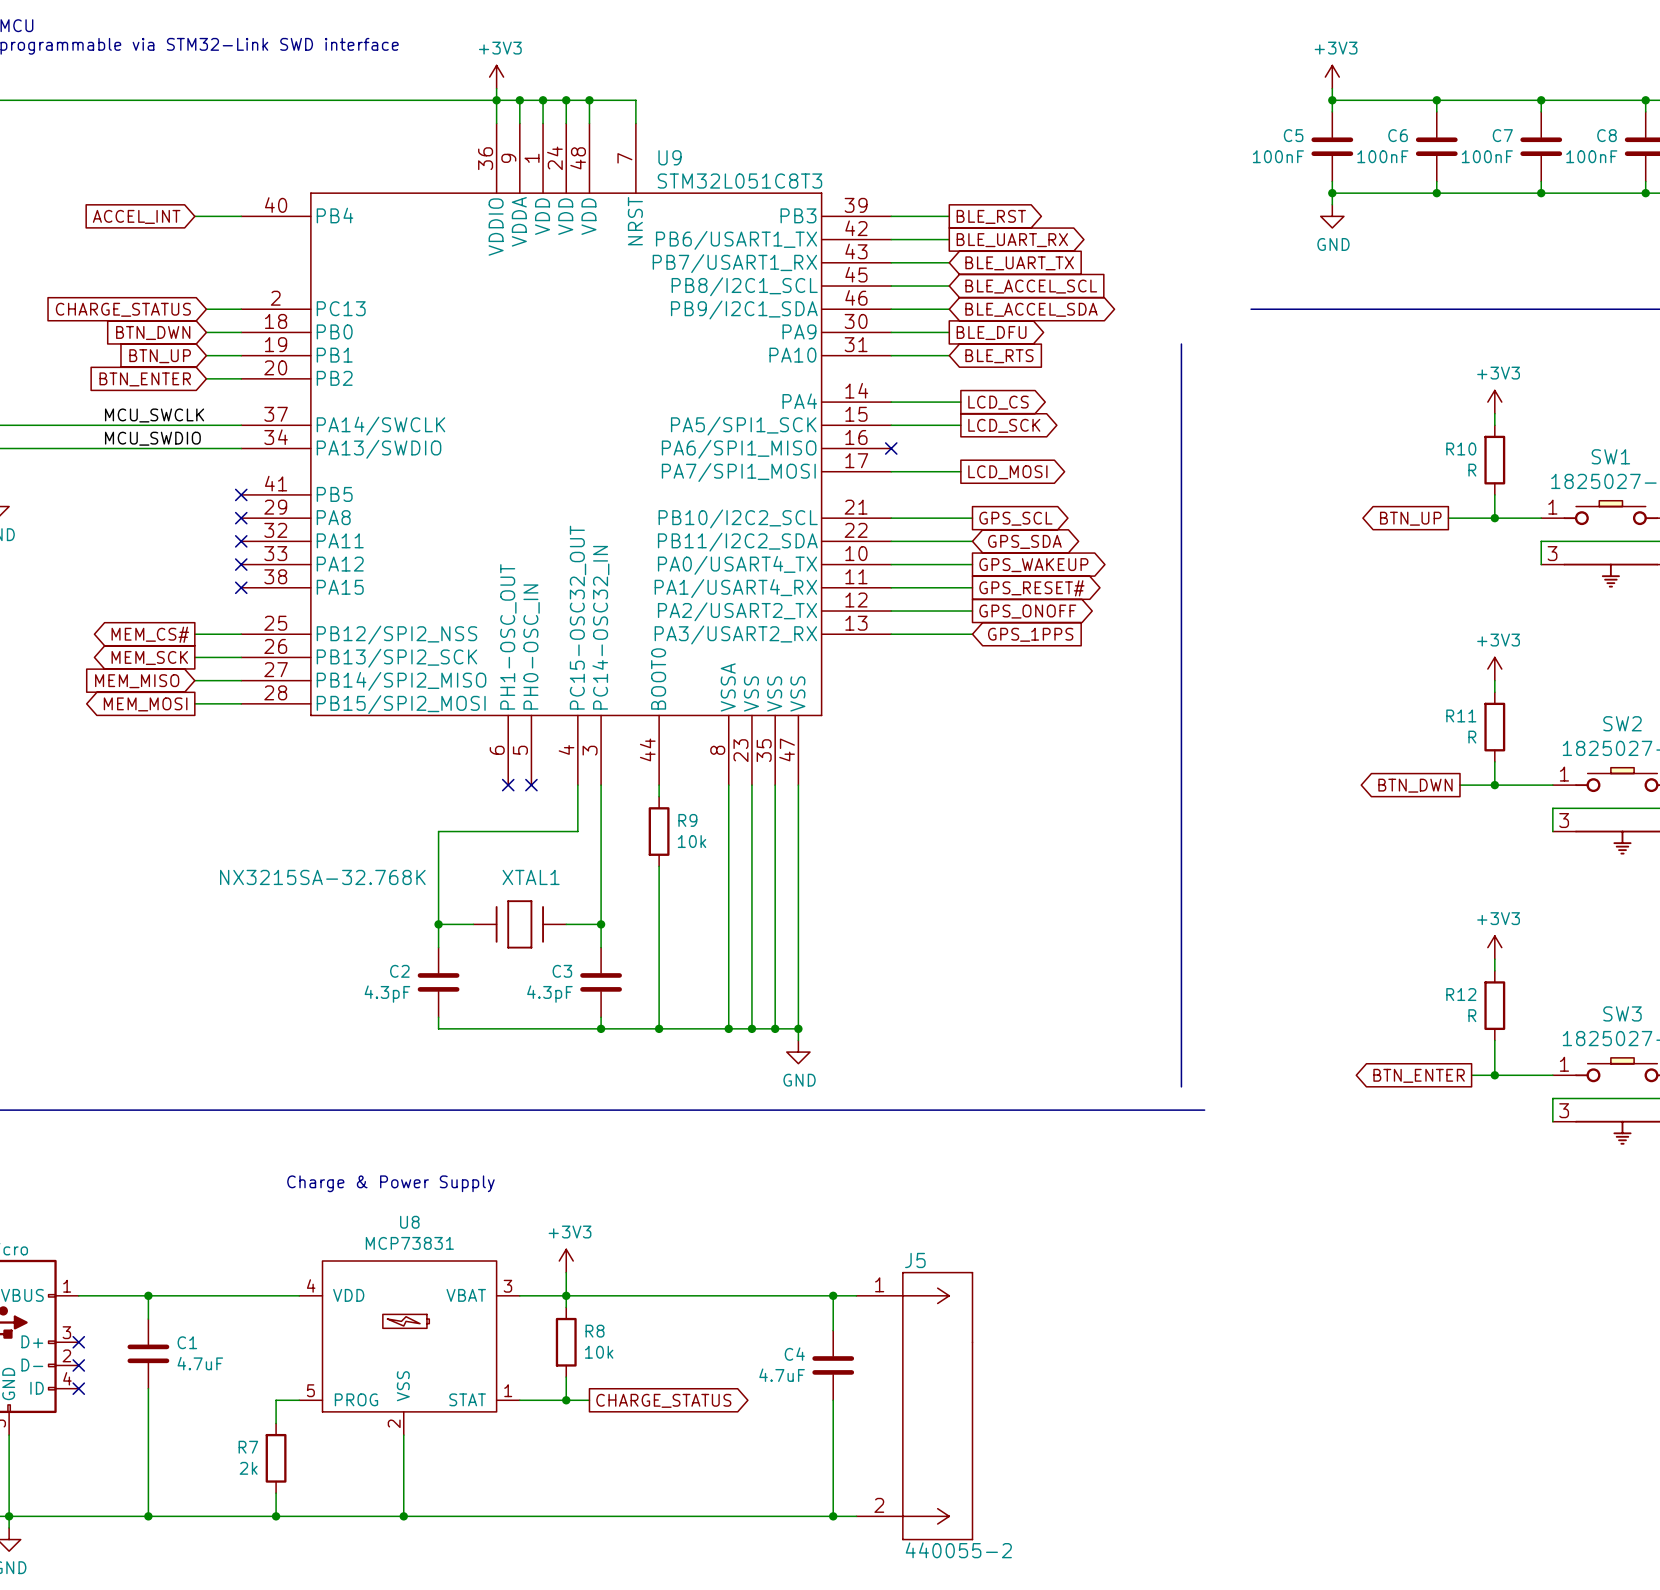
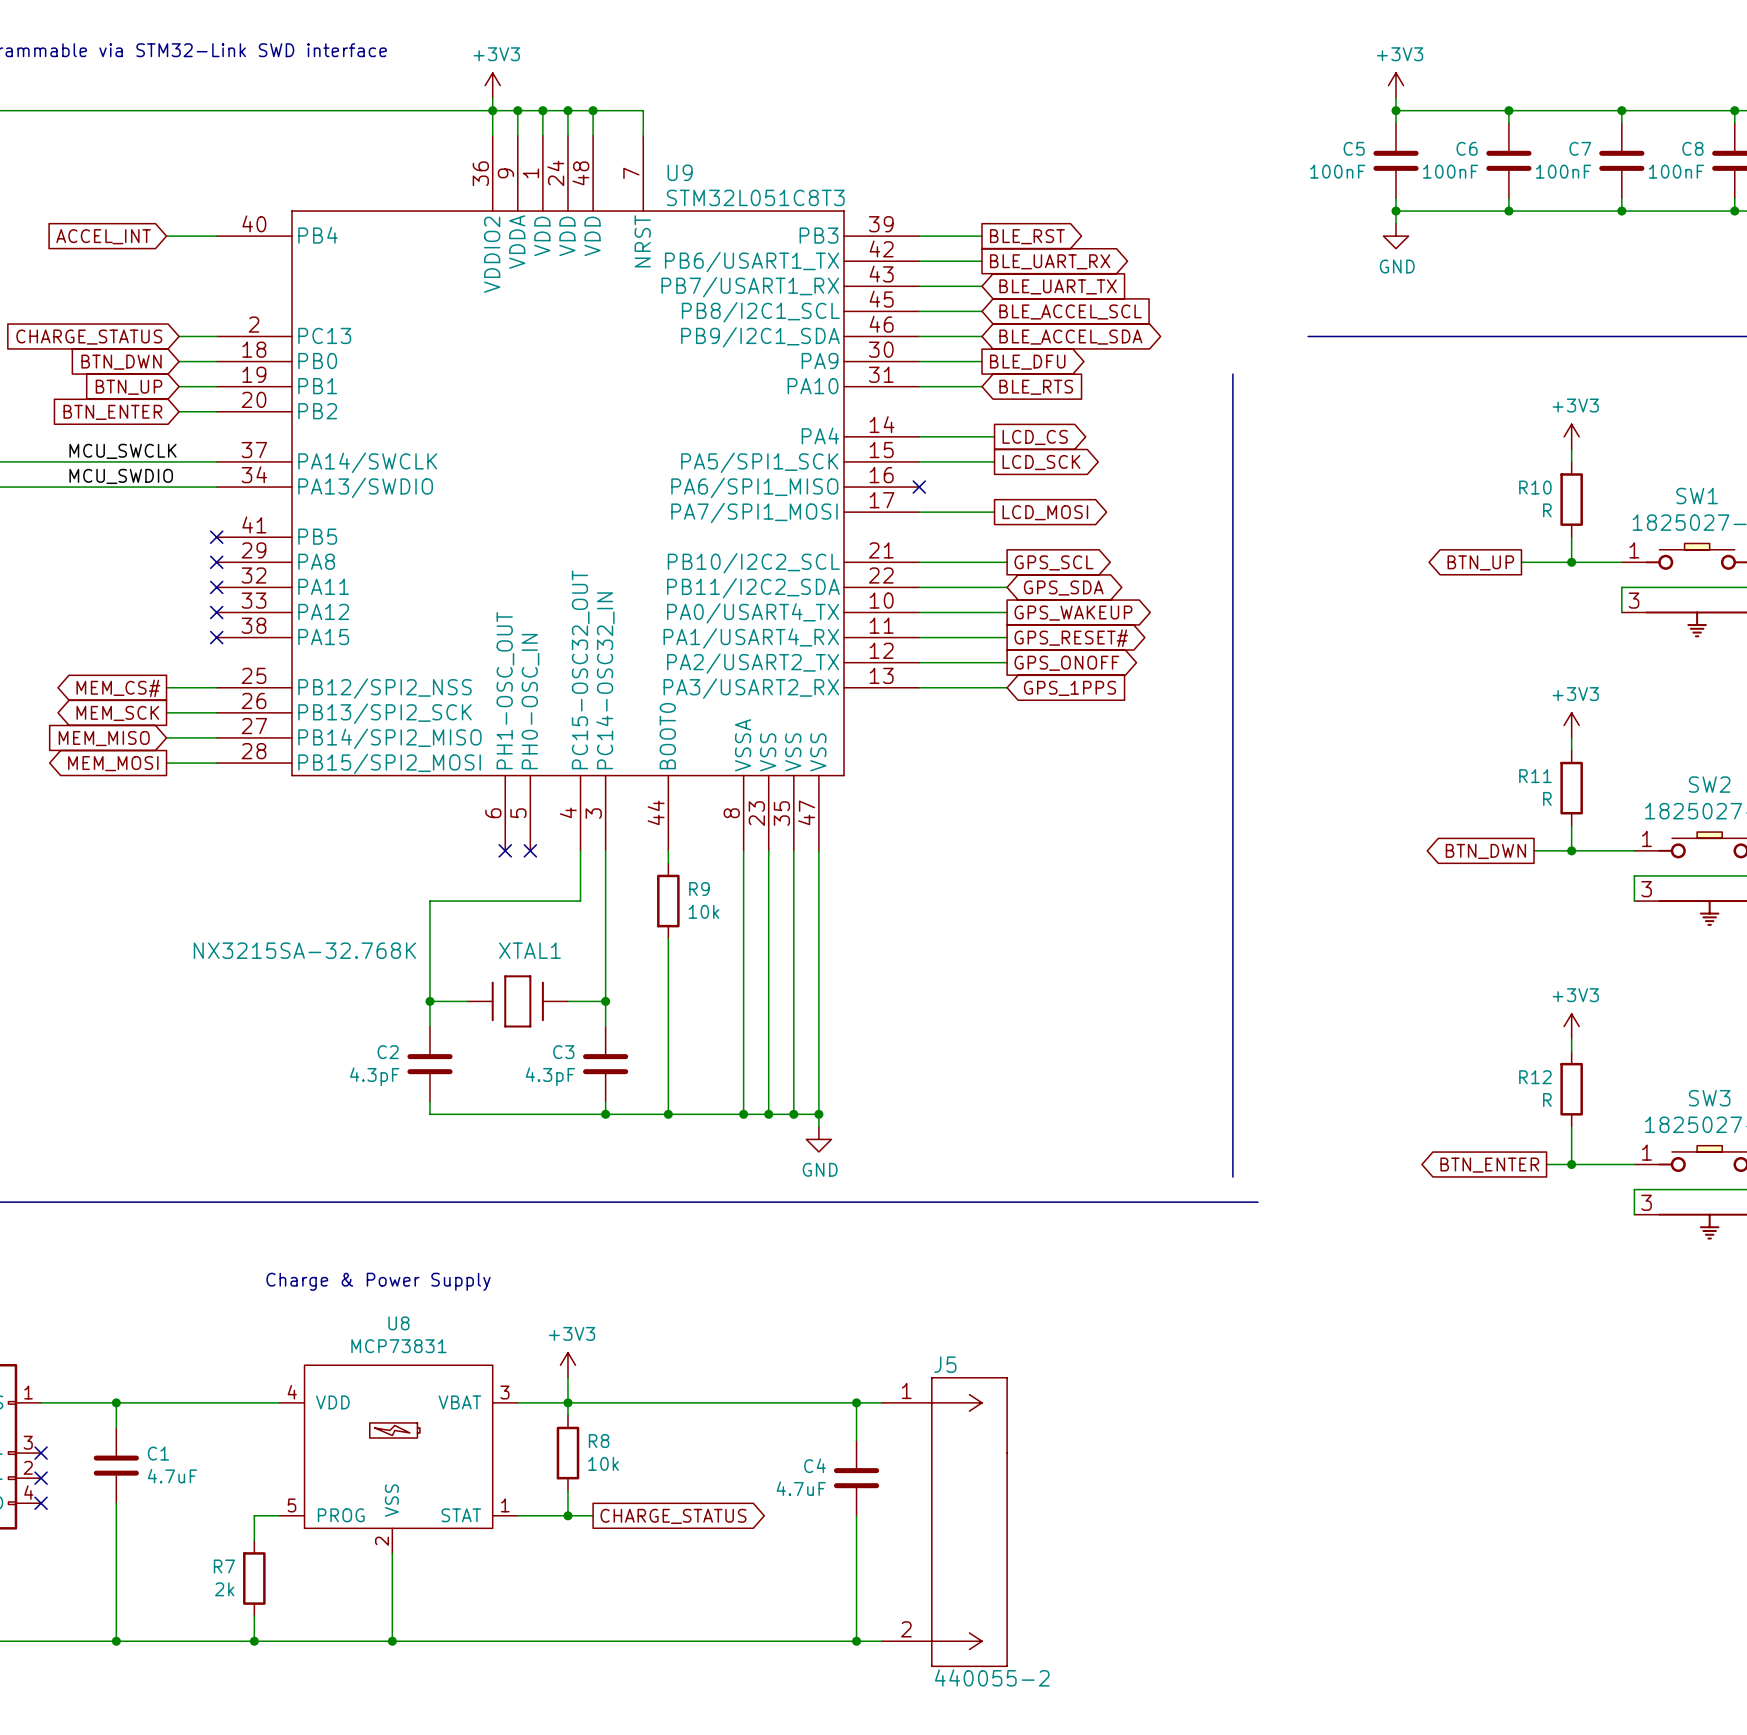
U9 pin name: VDDIO (496, 227) -> VDDIO2 (492, 254)

